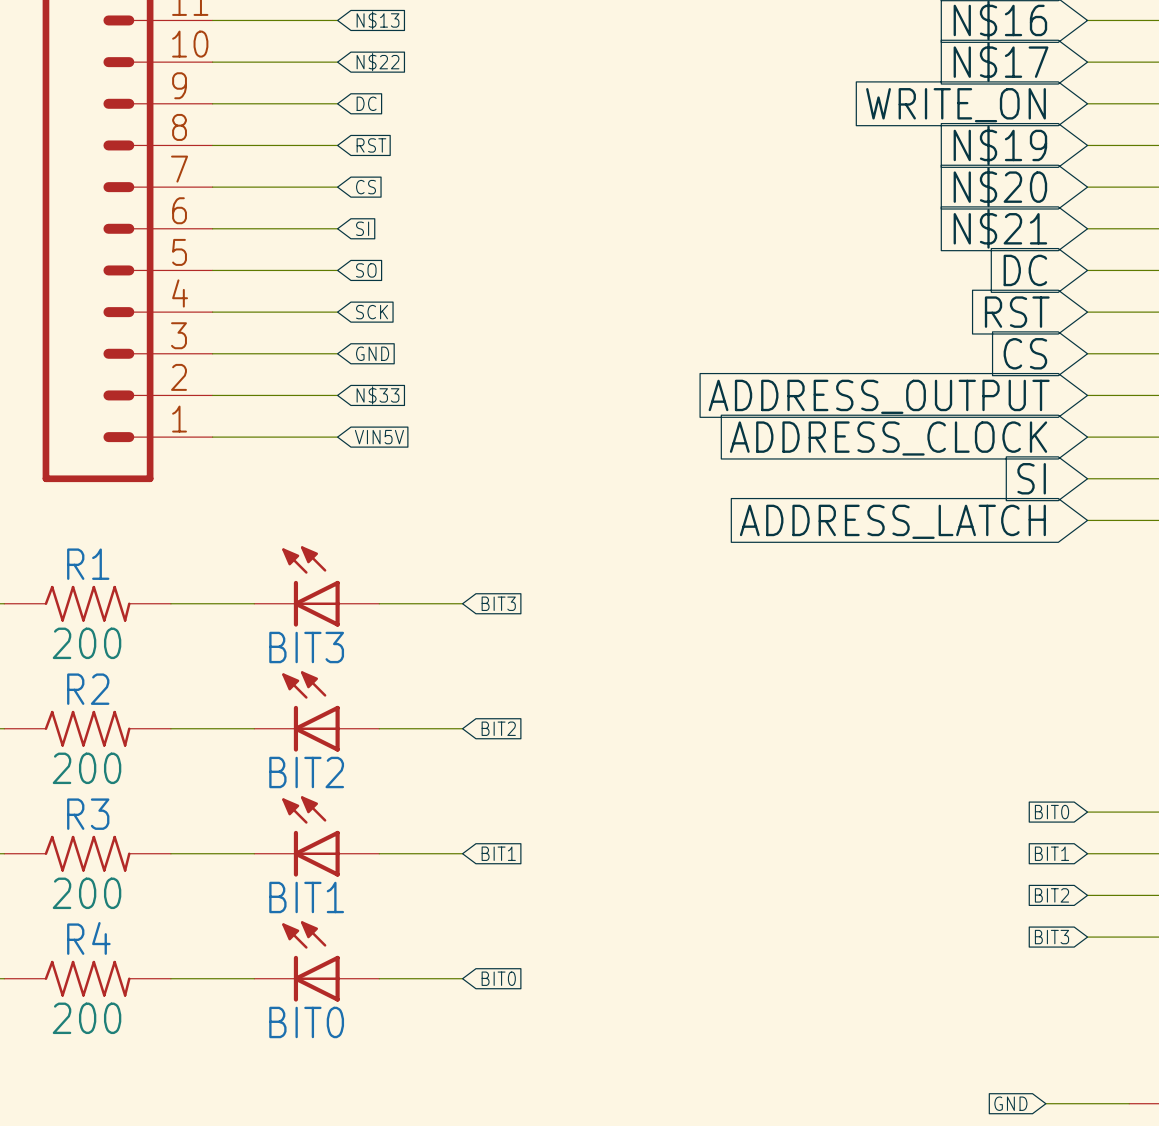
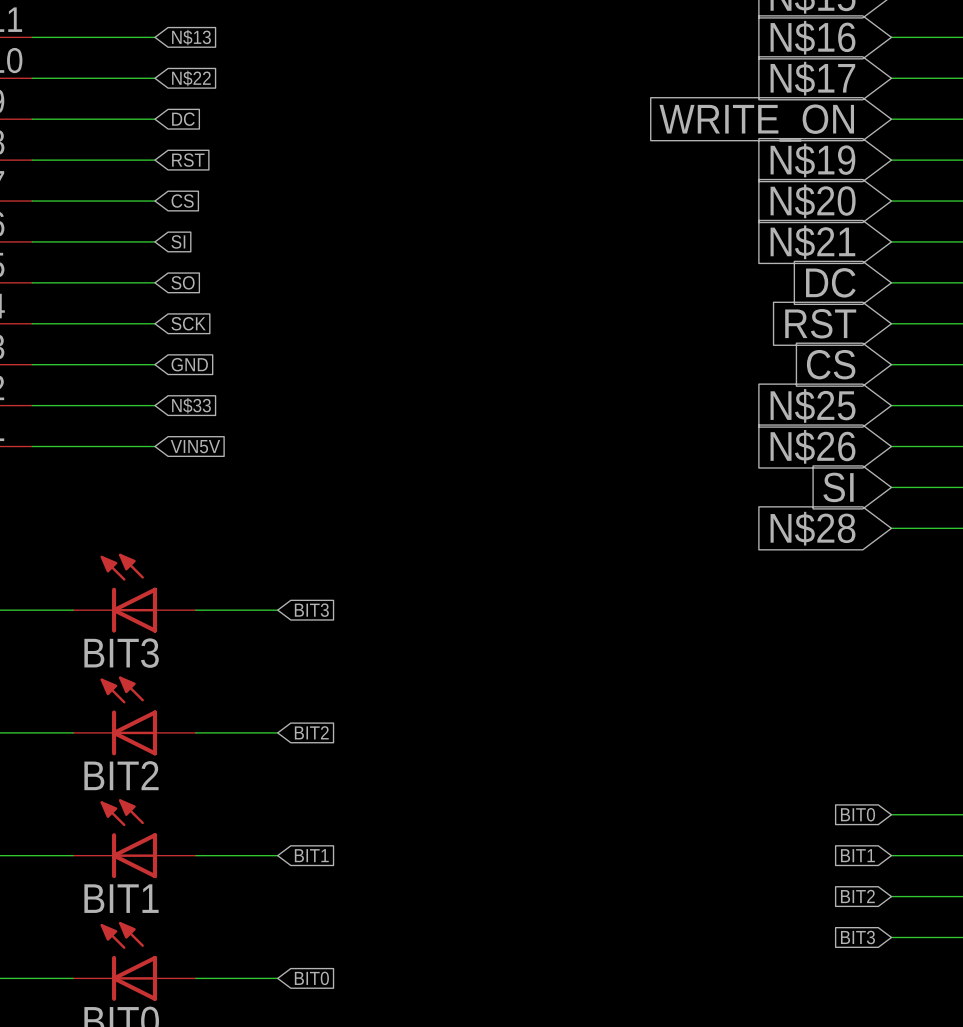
global label: ADDRESS_OUTPUT (879, 396) -> N$25 (813, 405)
global label: ADDRESS_CLOCK (888, 438) -> N$26 (812, 446)
global label: ADDRESS_LATCH (892, 521) -> N$28 (813, 528)

